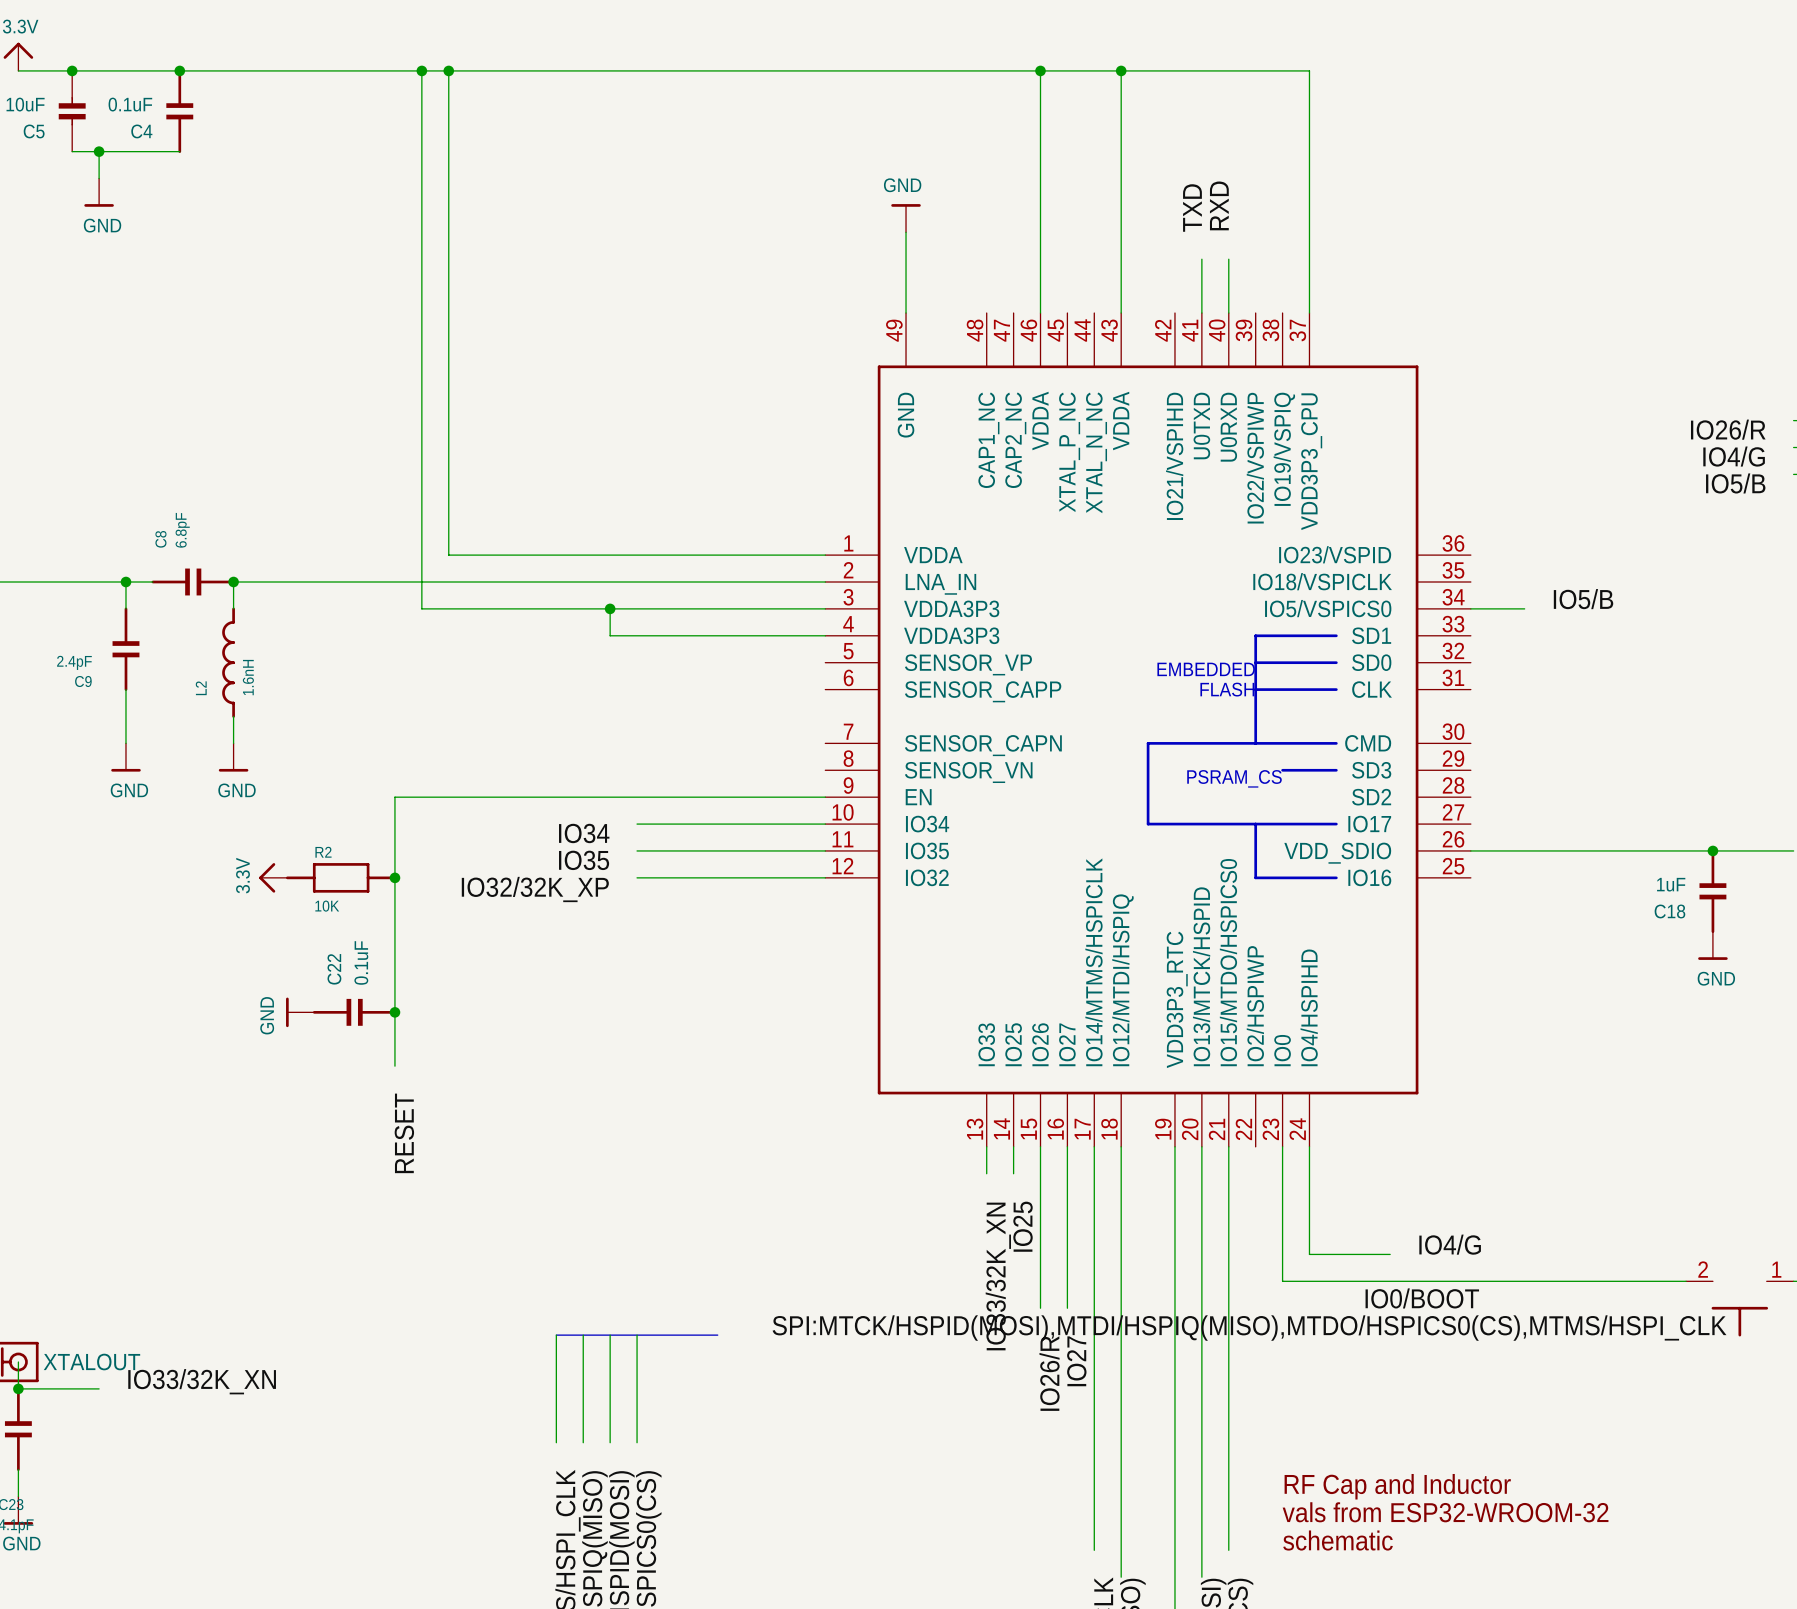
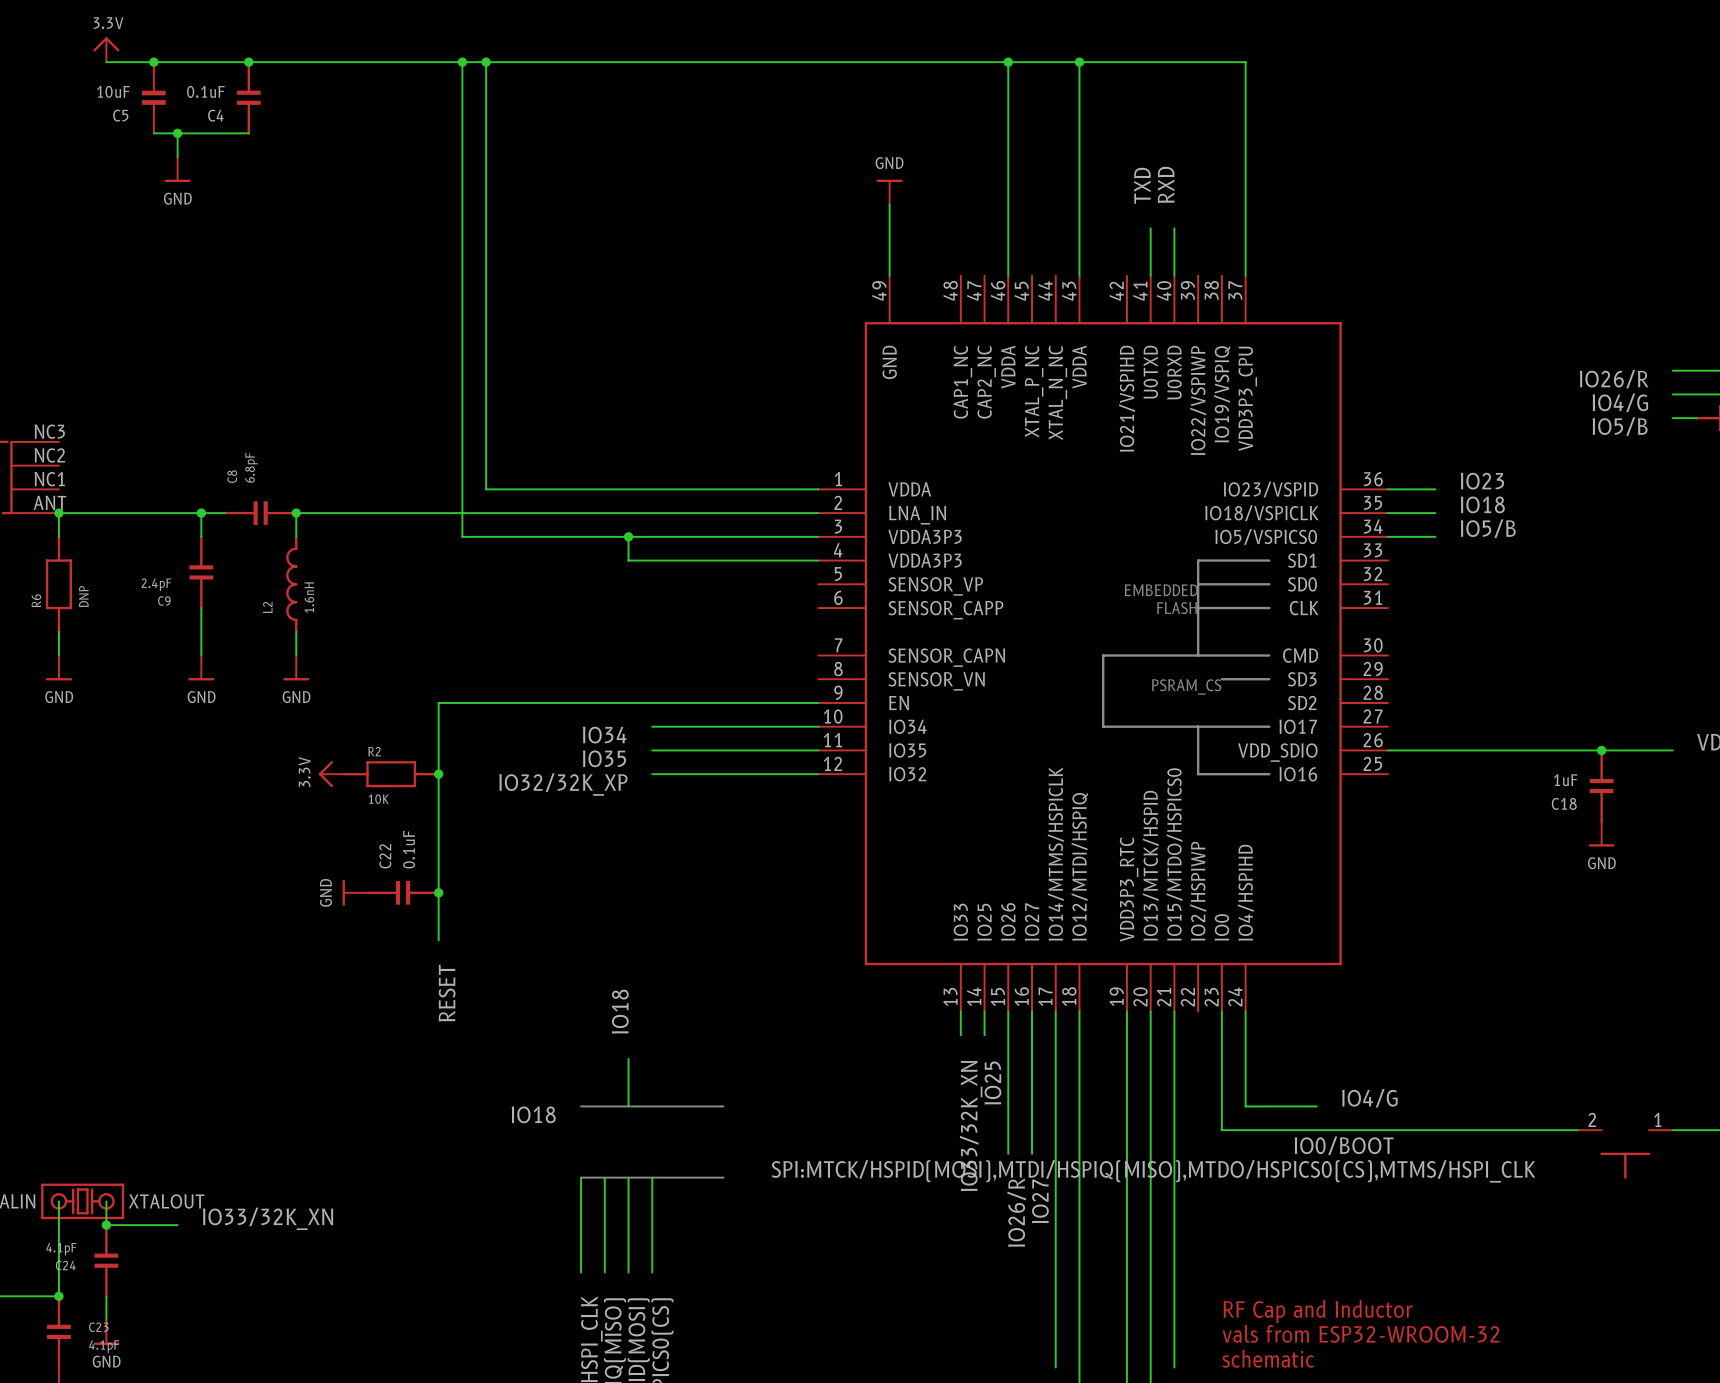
label: none -> IO23 (1482, 481)
wire: none -> (1388, 489) (1435, 489)
label: none -> IO18 (1482, 504)
wire: none -> (1388, 513) (1435, 513)
label: none -> IO18 (620, 1011)
wire: none -> (628, 1058) (628, 1106)
bus: none -> (581, 1106) (723, 1106)
label: none -> IO18 (533, 1114)

